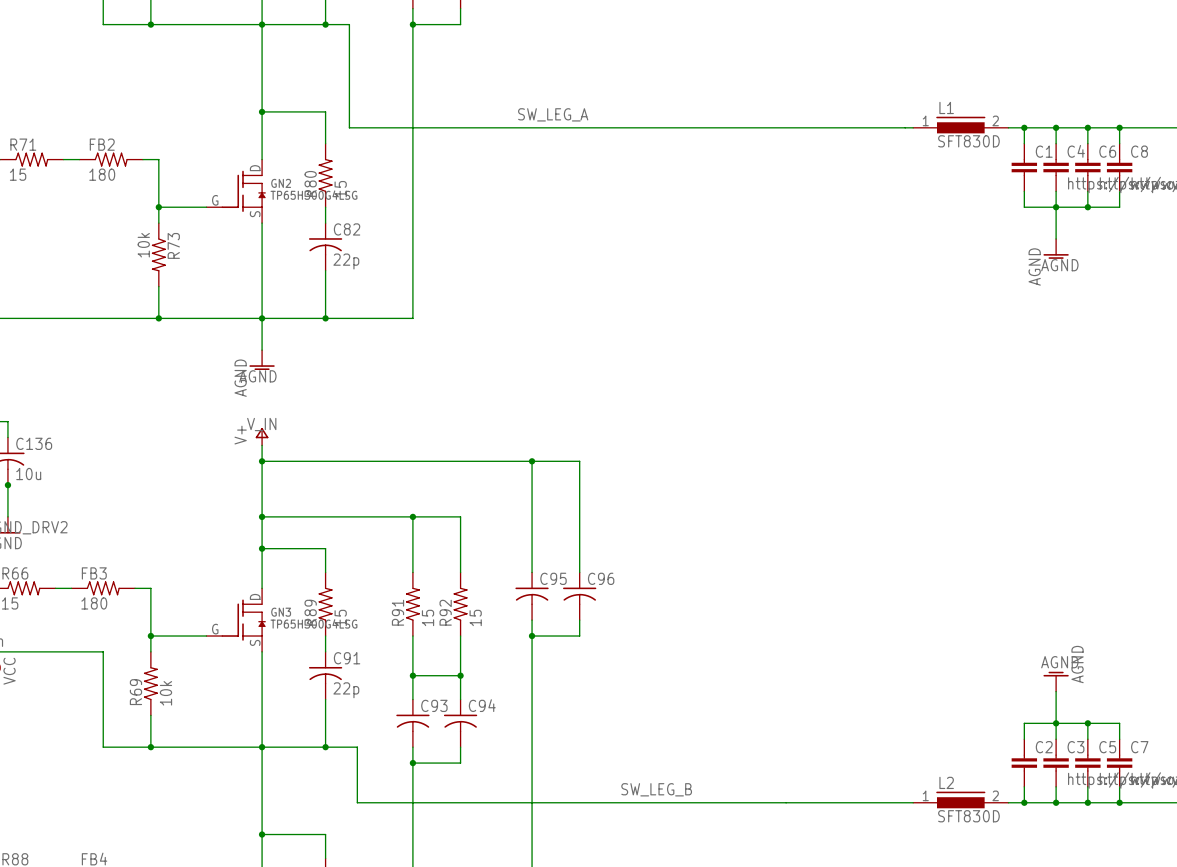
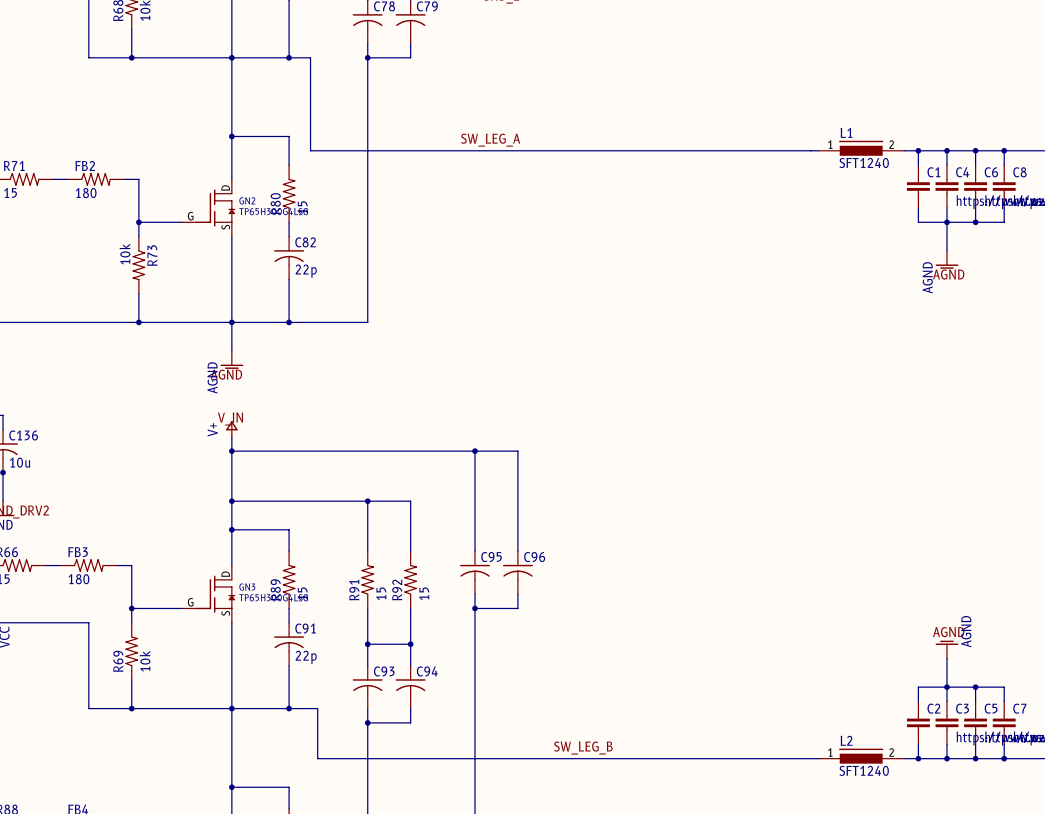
L1 value: SFT830D (968, 141) -> SFT1240 (864, 162)
L2 value: SFT830D (968, 816) -> SFT1240 (864, 770)

